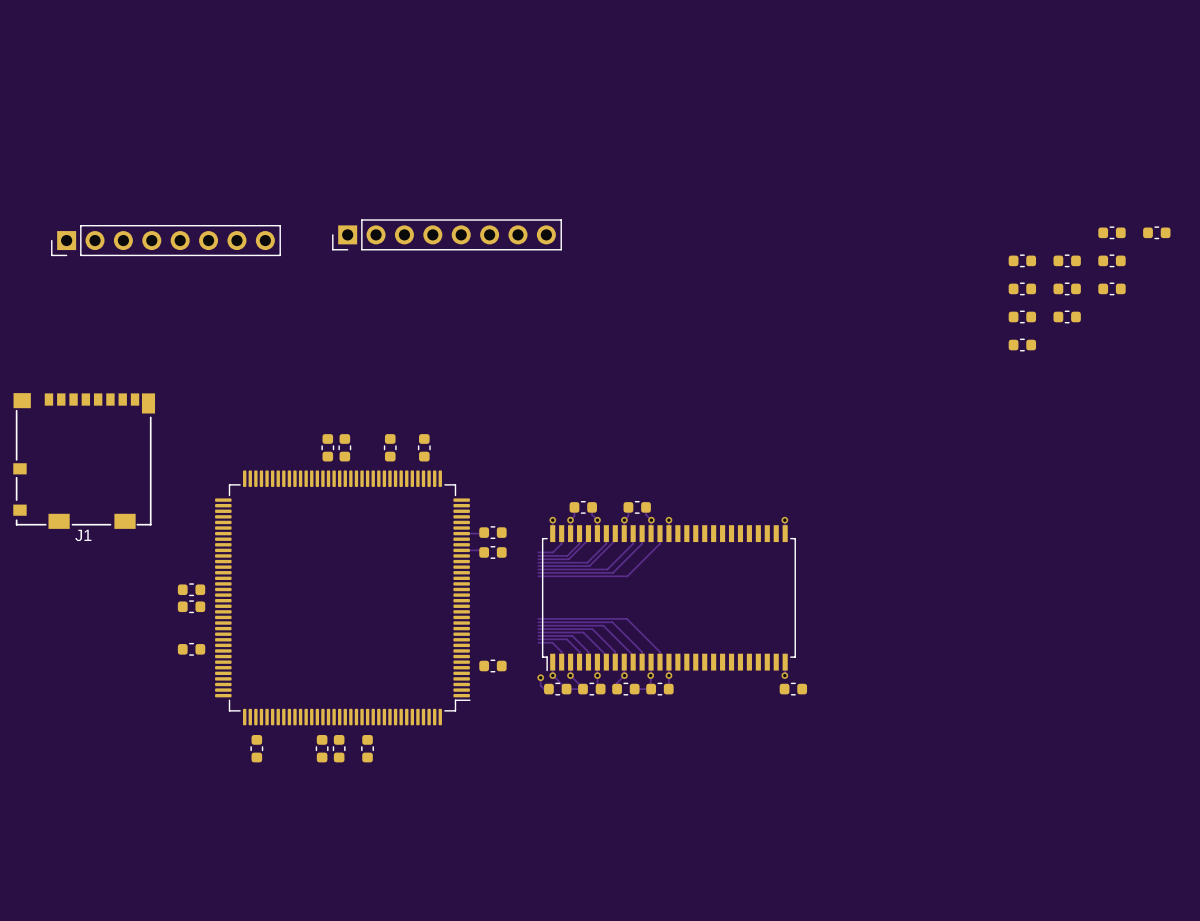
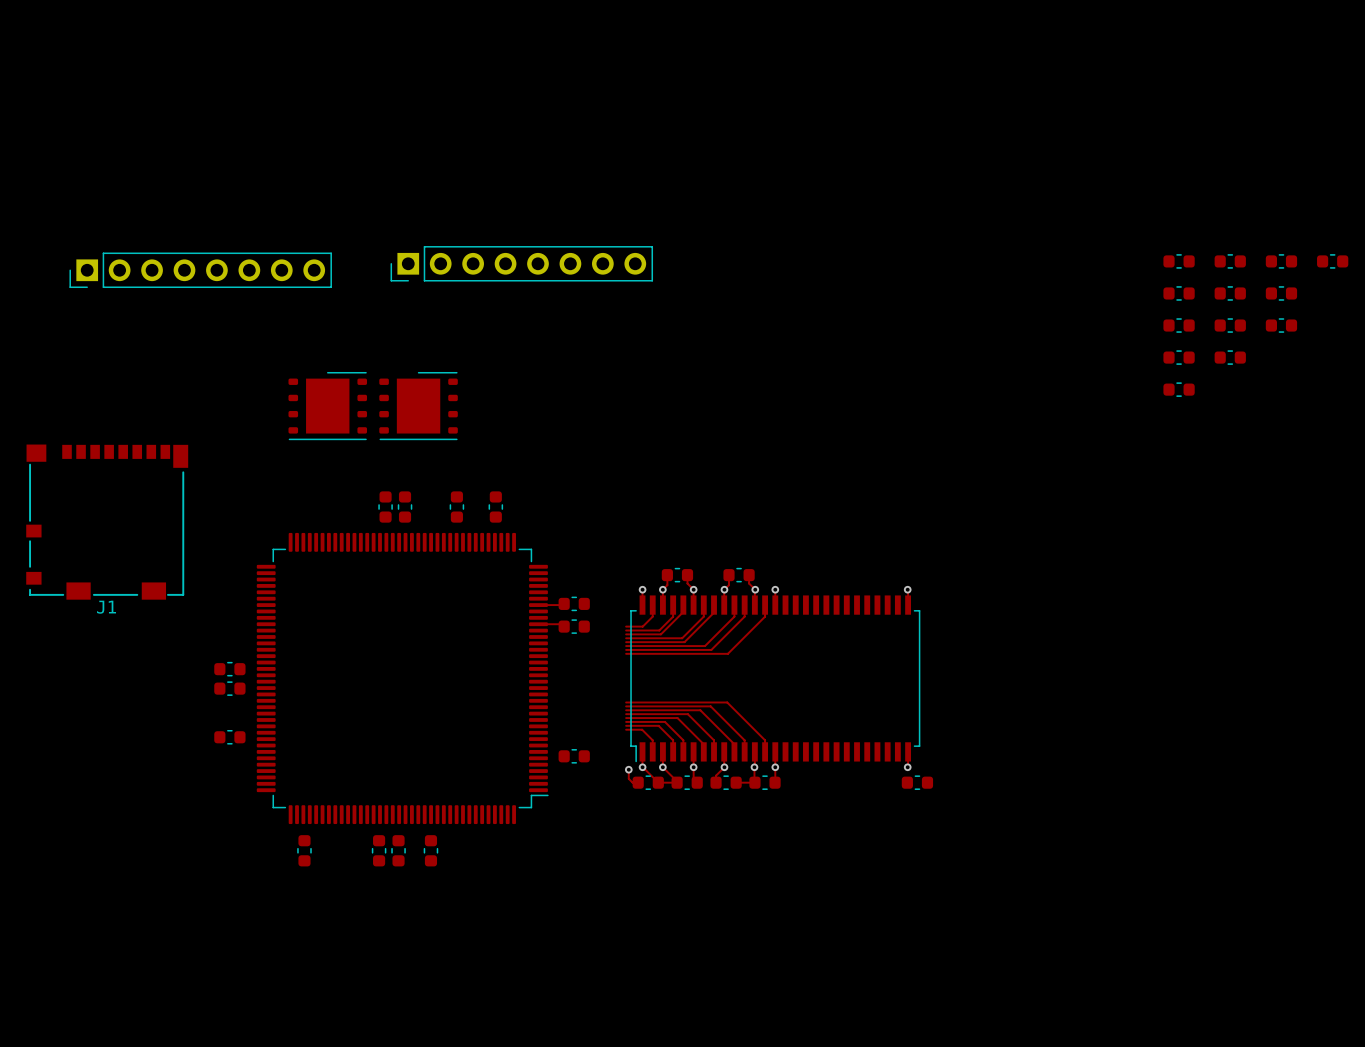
part: none -> (1179, 261)
part: none -> (1230, 261)
part: none -> (327, 406)
part: none -> (418, 406)

